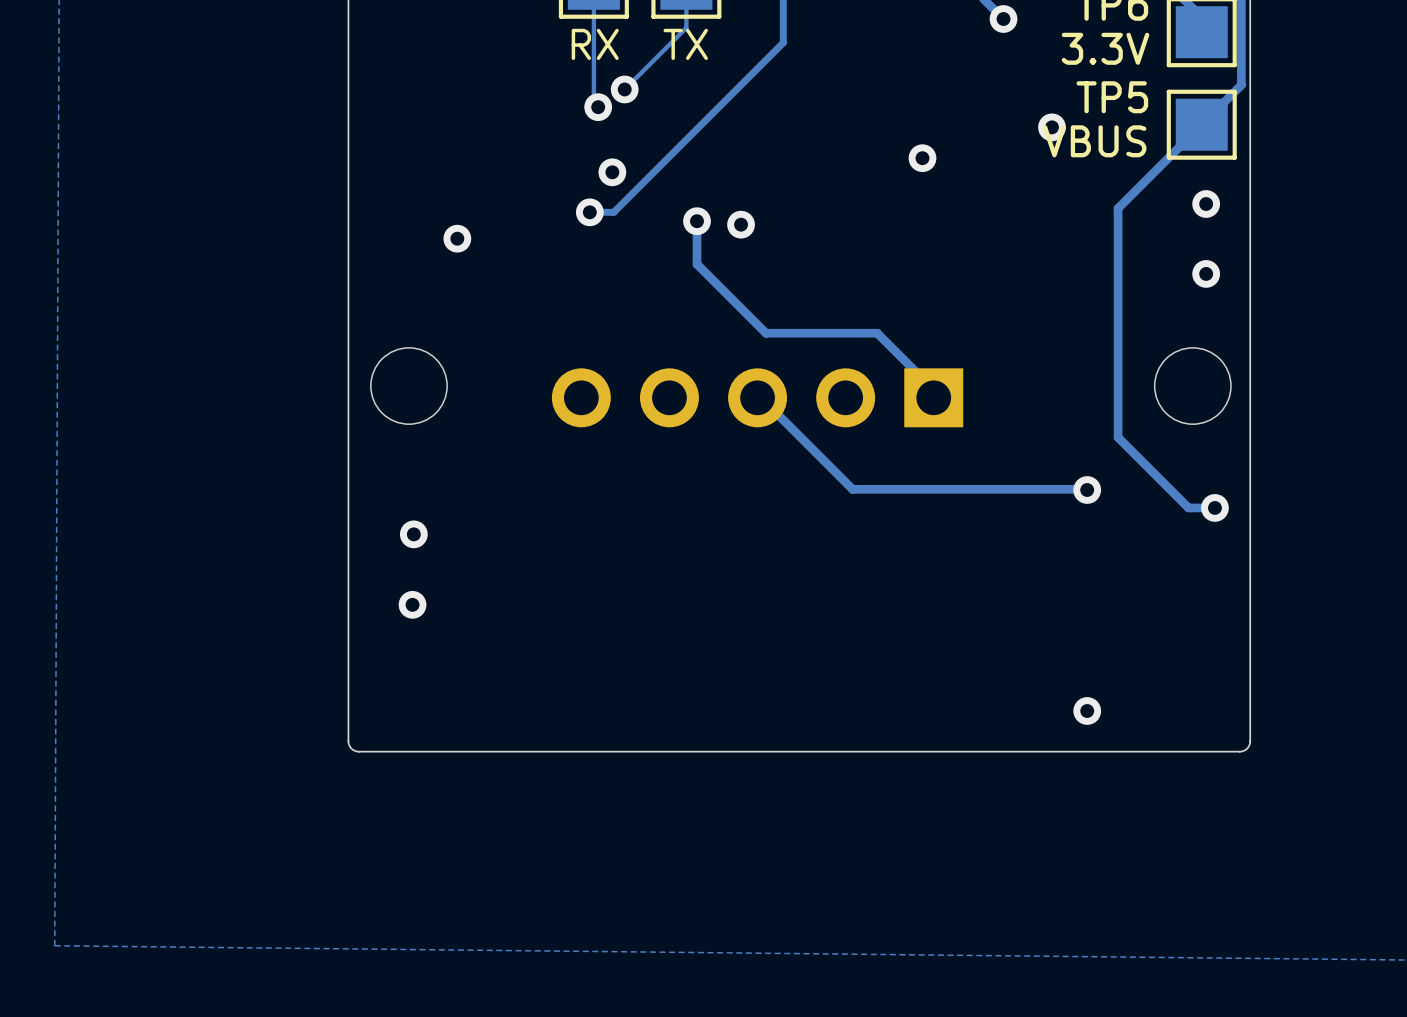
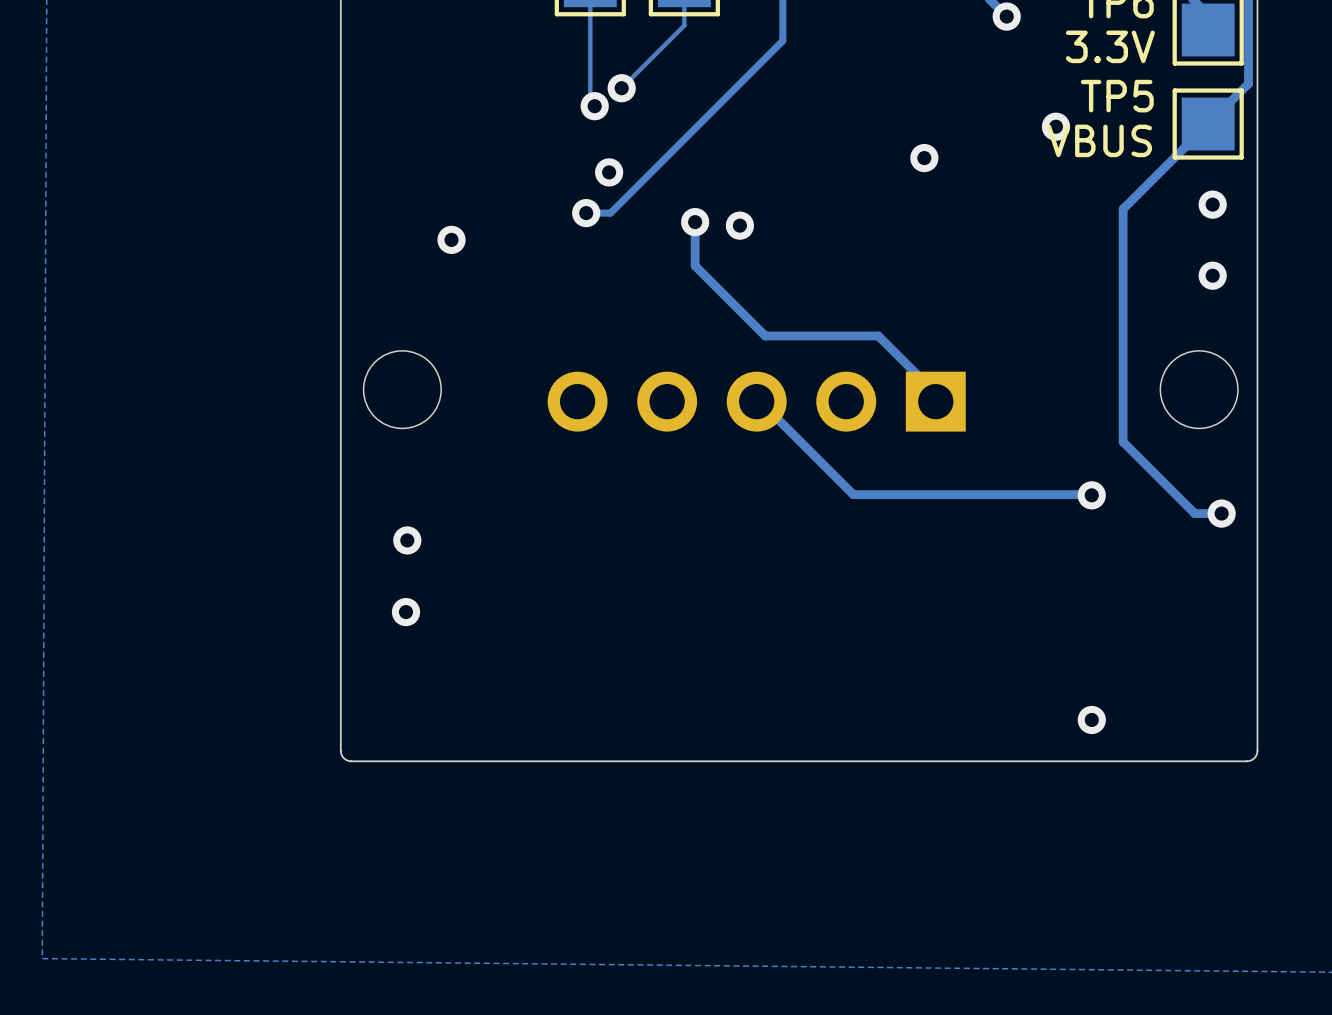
part value: RX (595, 44) -> none
part value: TX (685, 44) -> none

